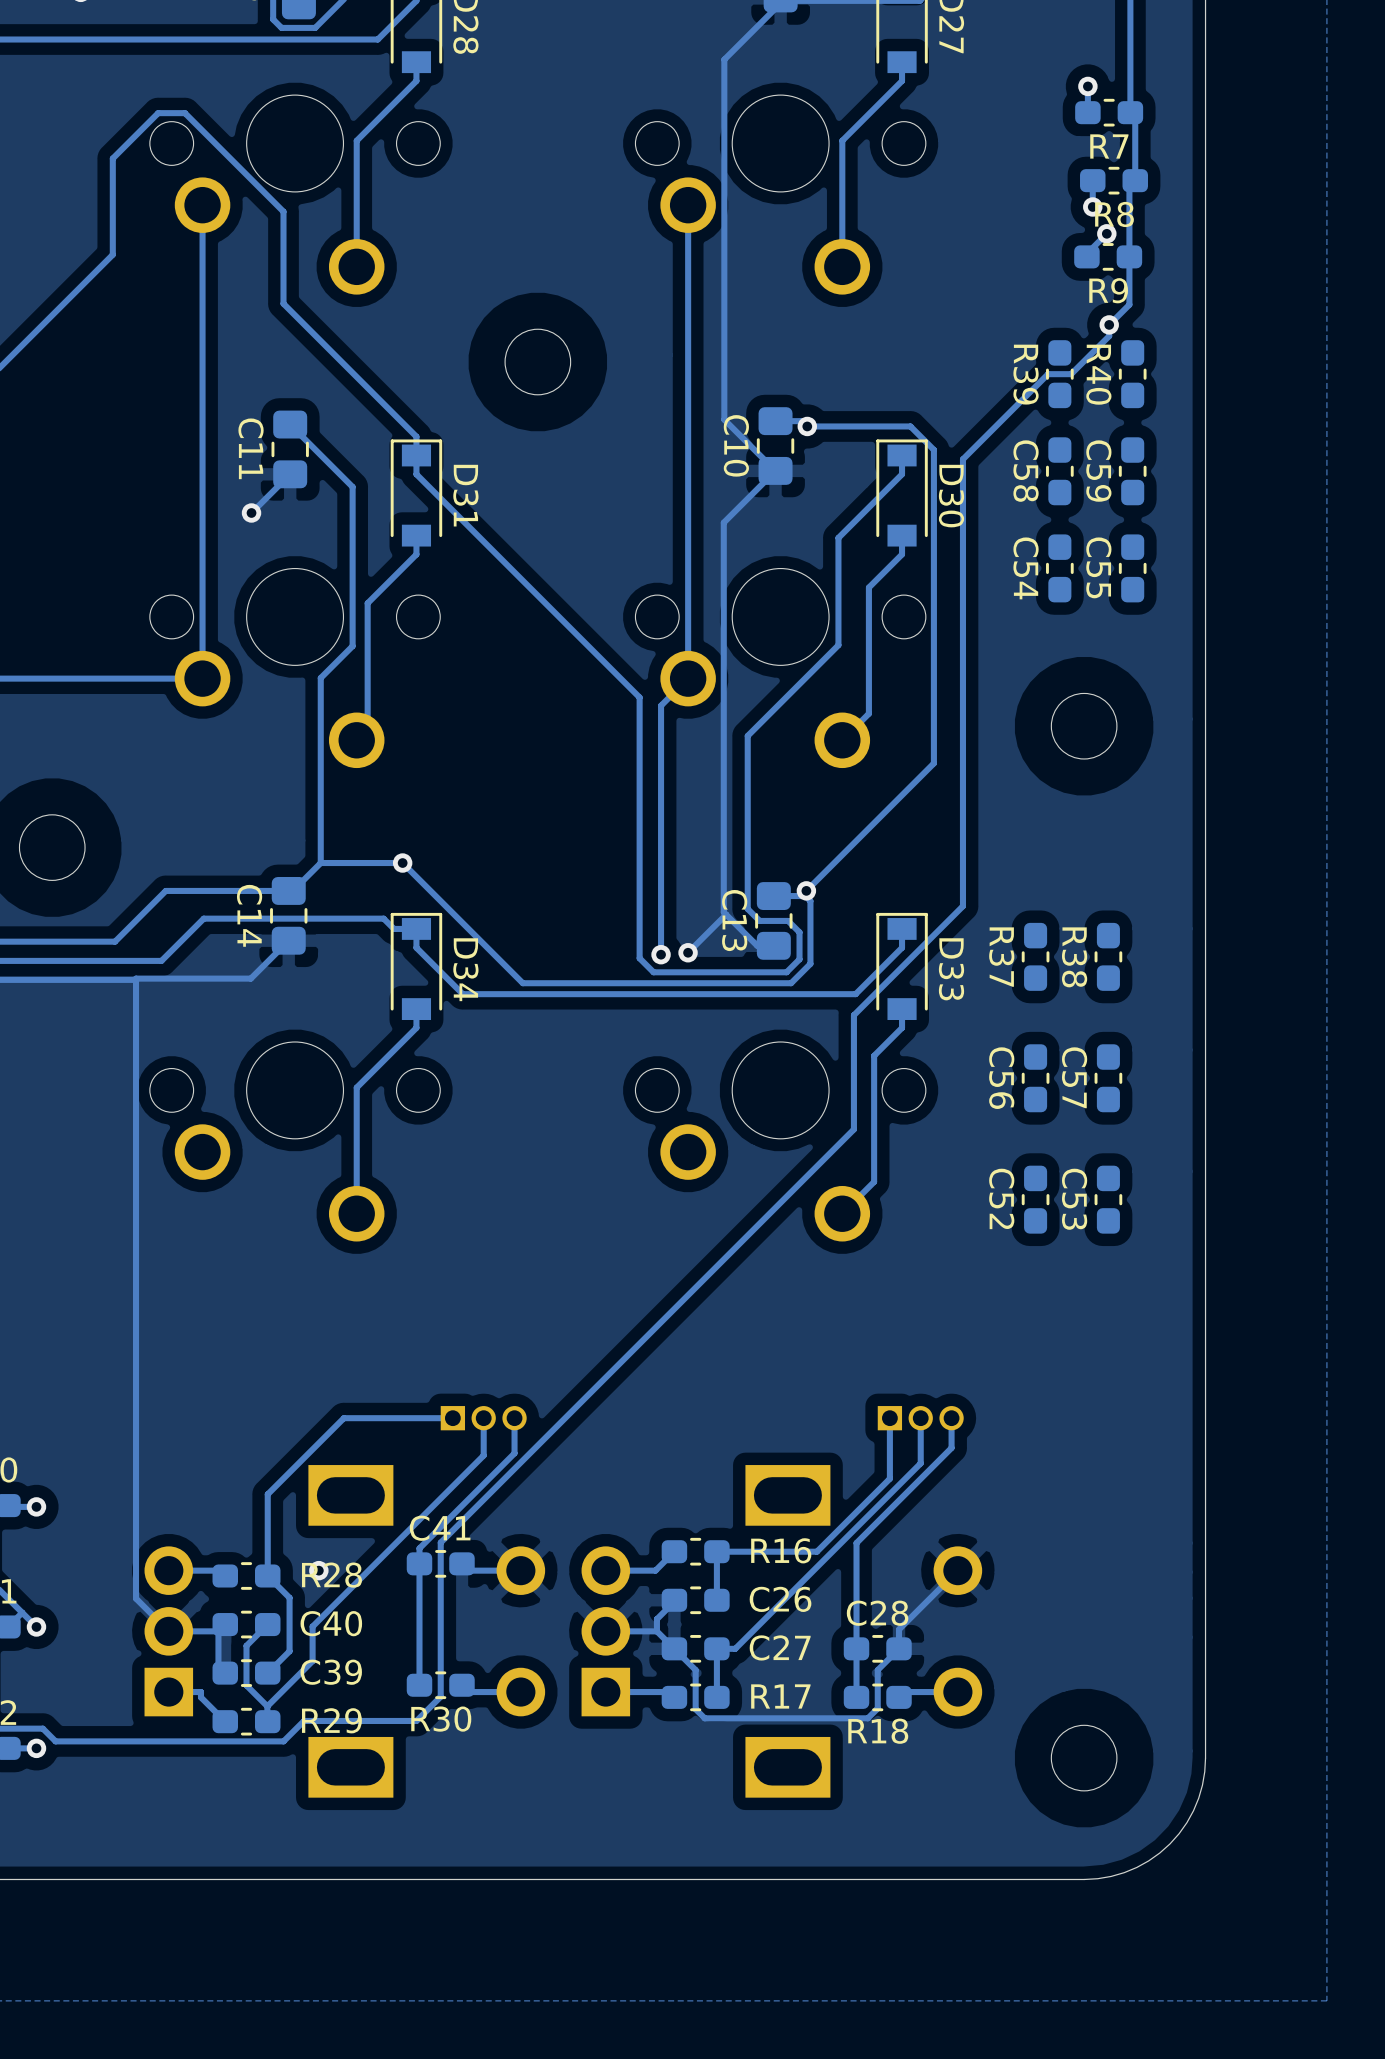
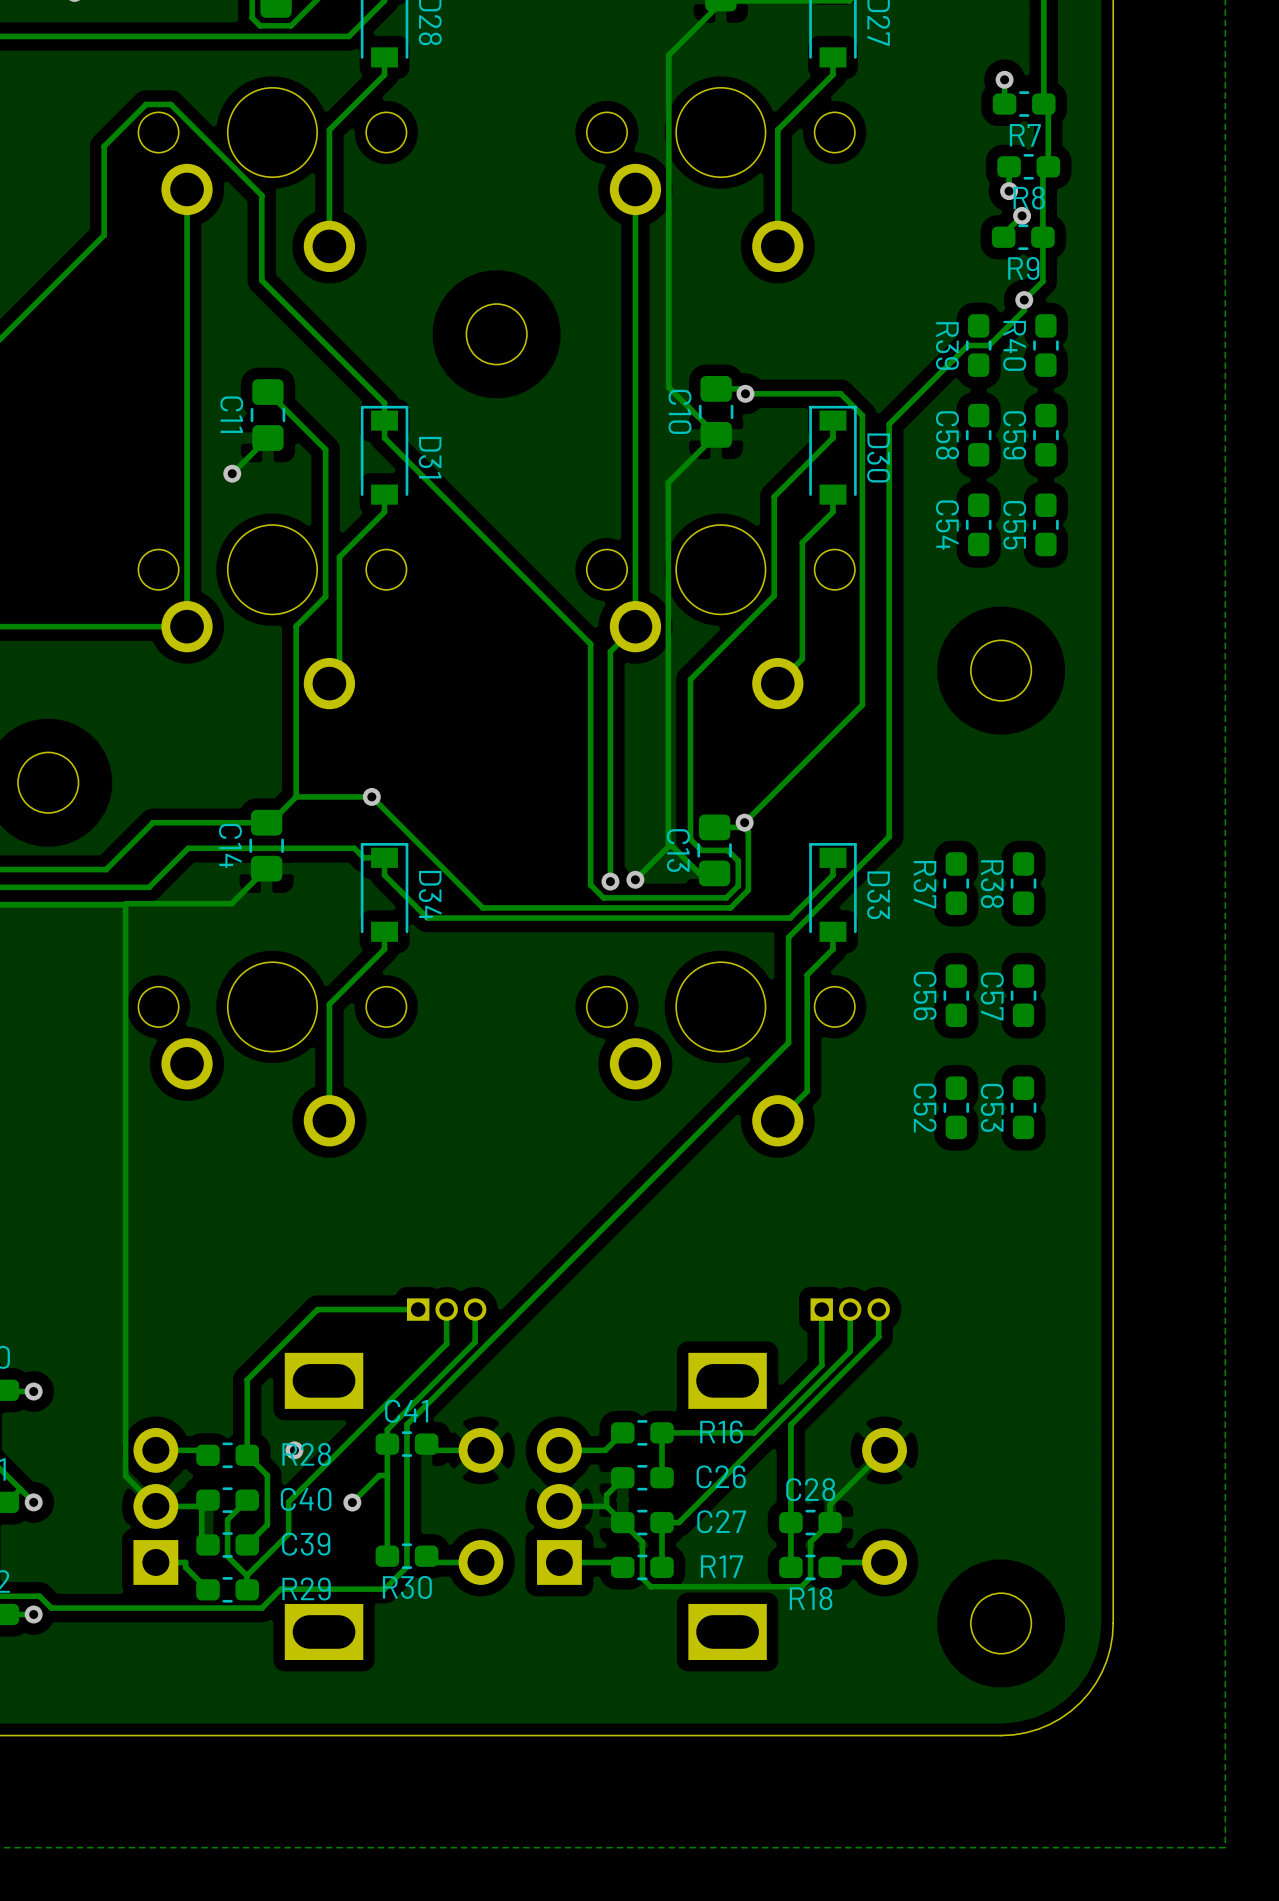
track: none -> (387, 1475) (379, 1475) (352, 1502)
via: none -> (352, 1502)

